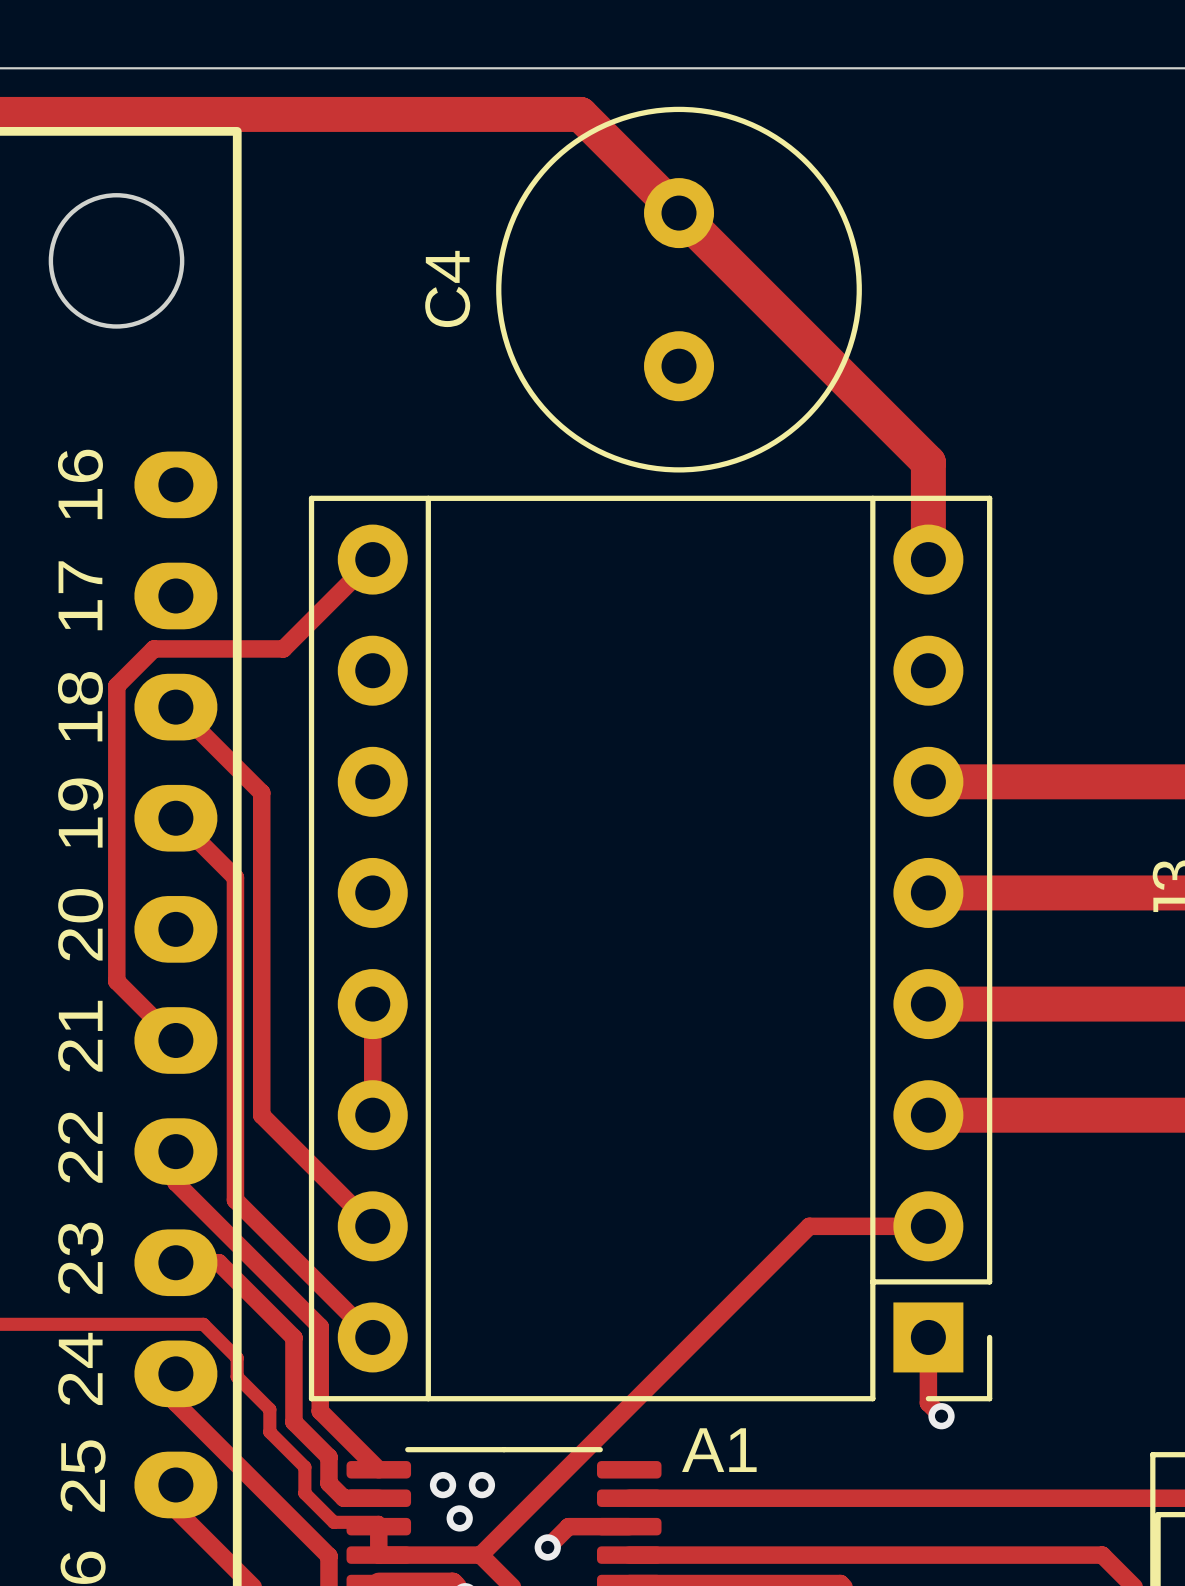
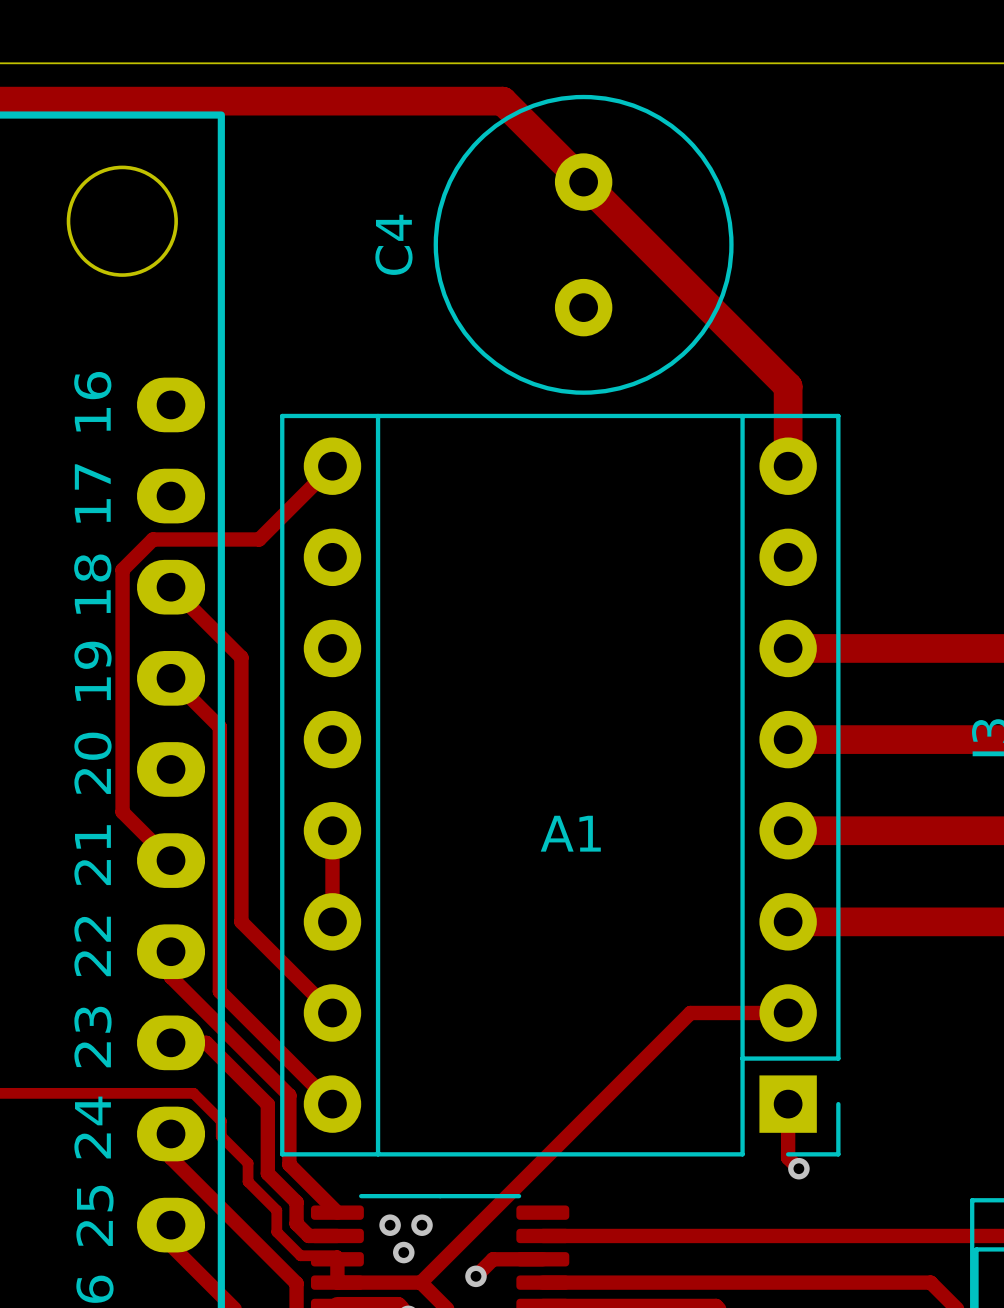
A1 name position: A1 (719, 1450) -> A1 (570, 833)

